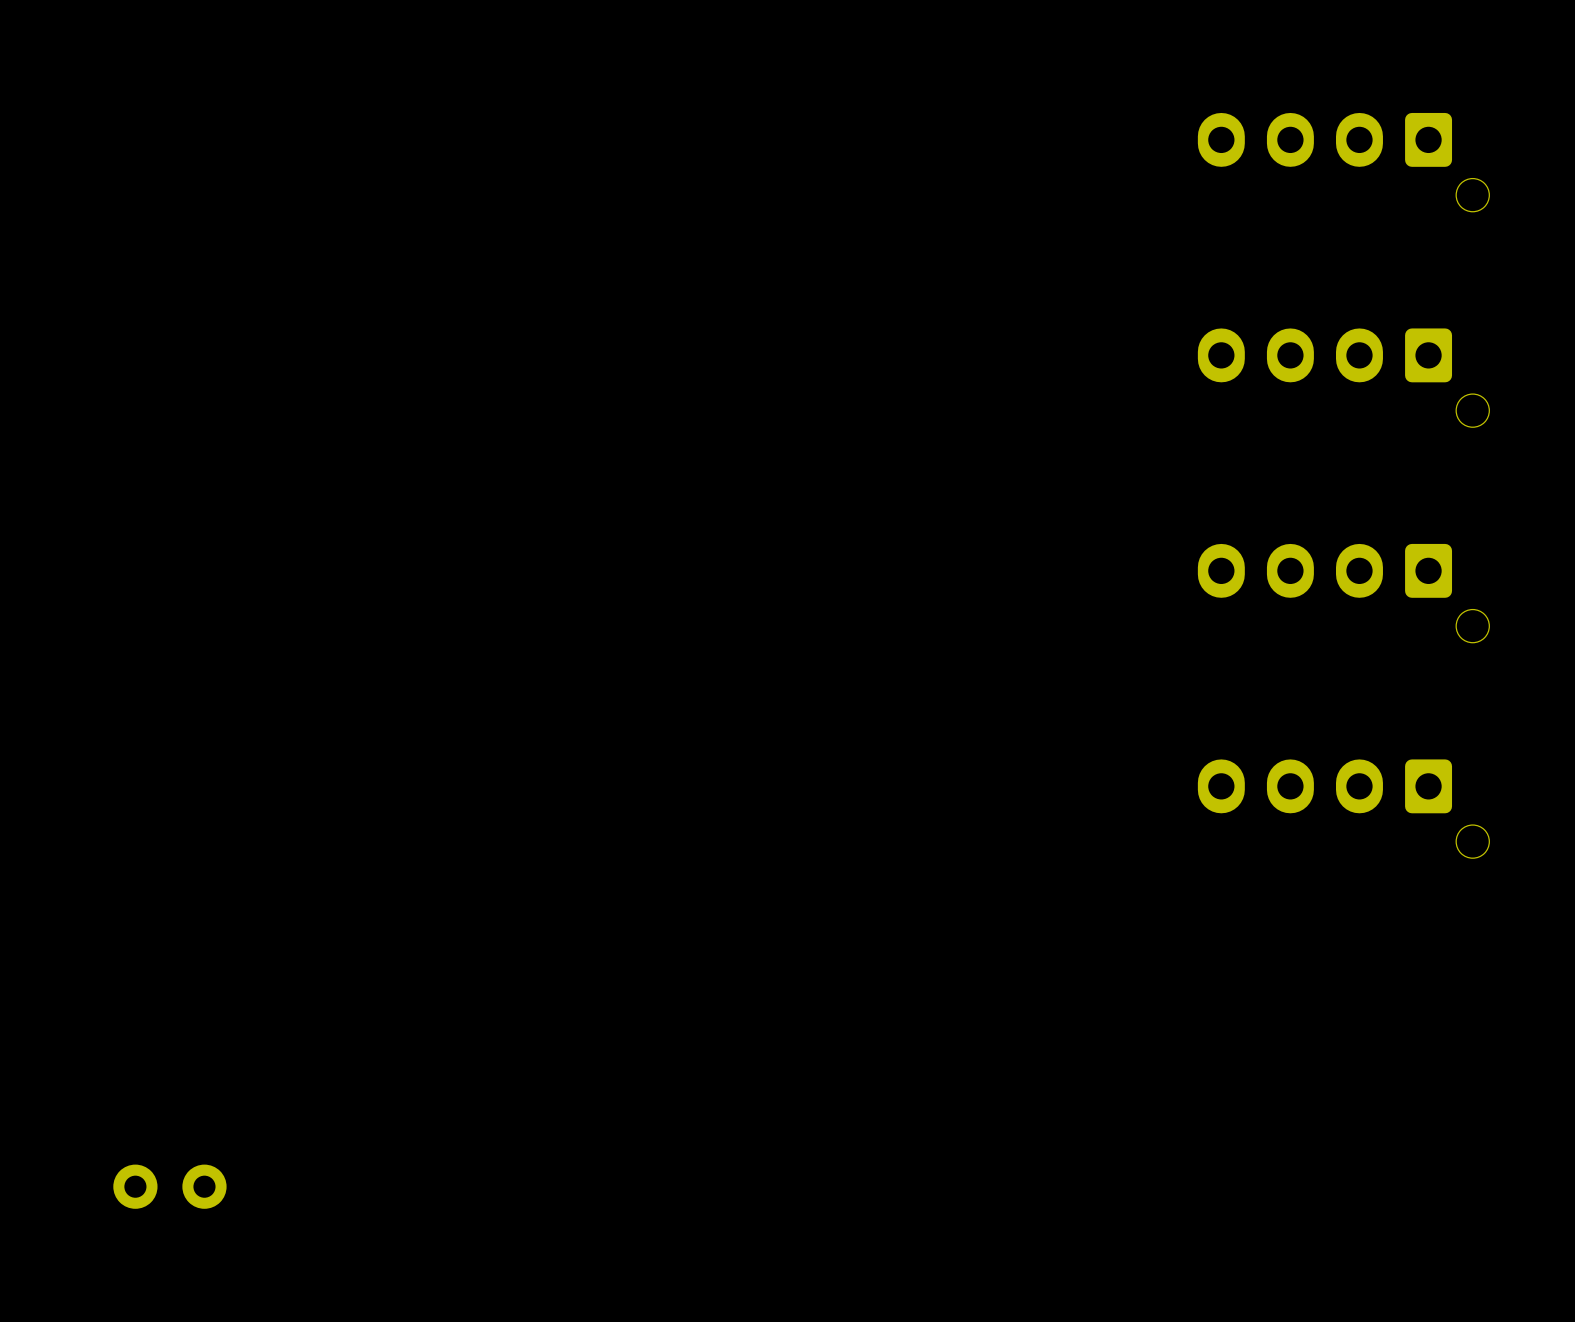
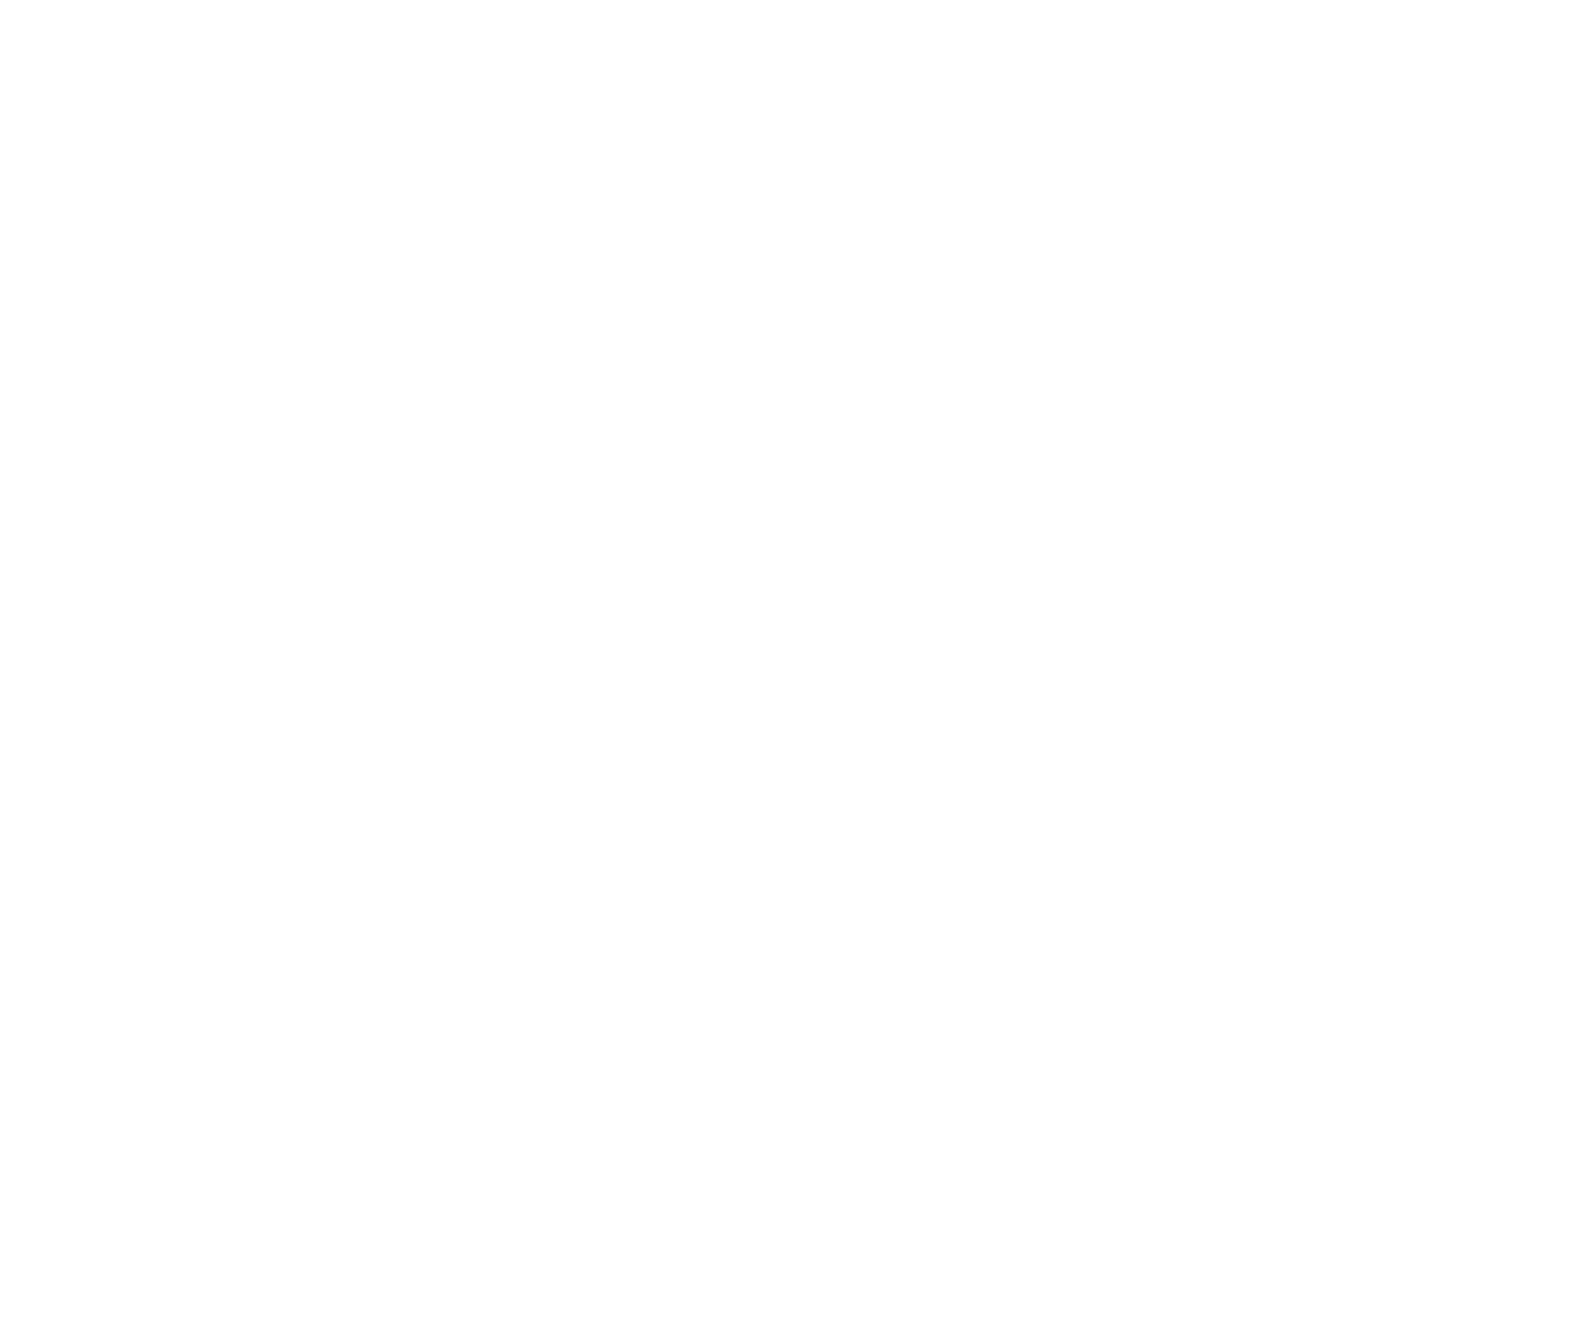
part: (1343, 162) -> none
part: (1343, 377) -> none
part: (1343, 593) -> none
part: (1343, 808) -> none
part: (169, 1186) -> none

